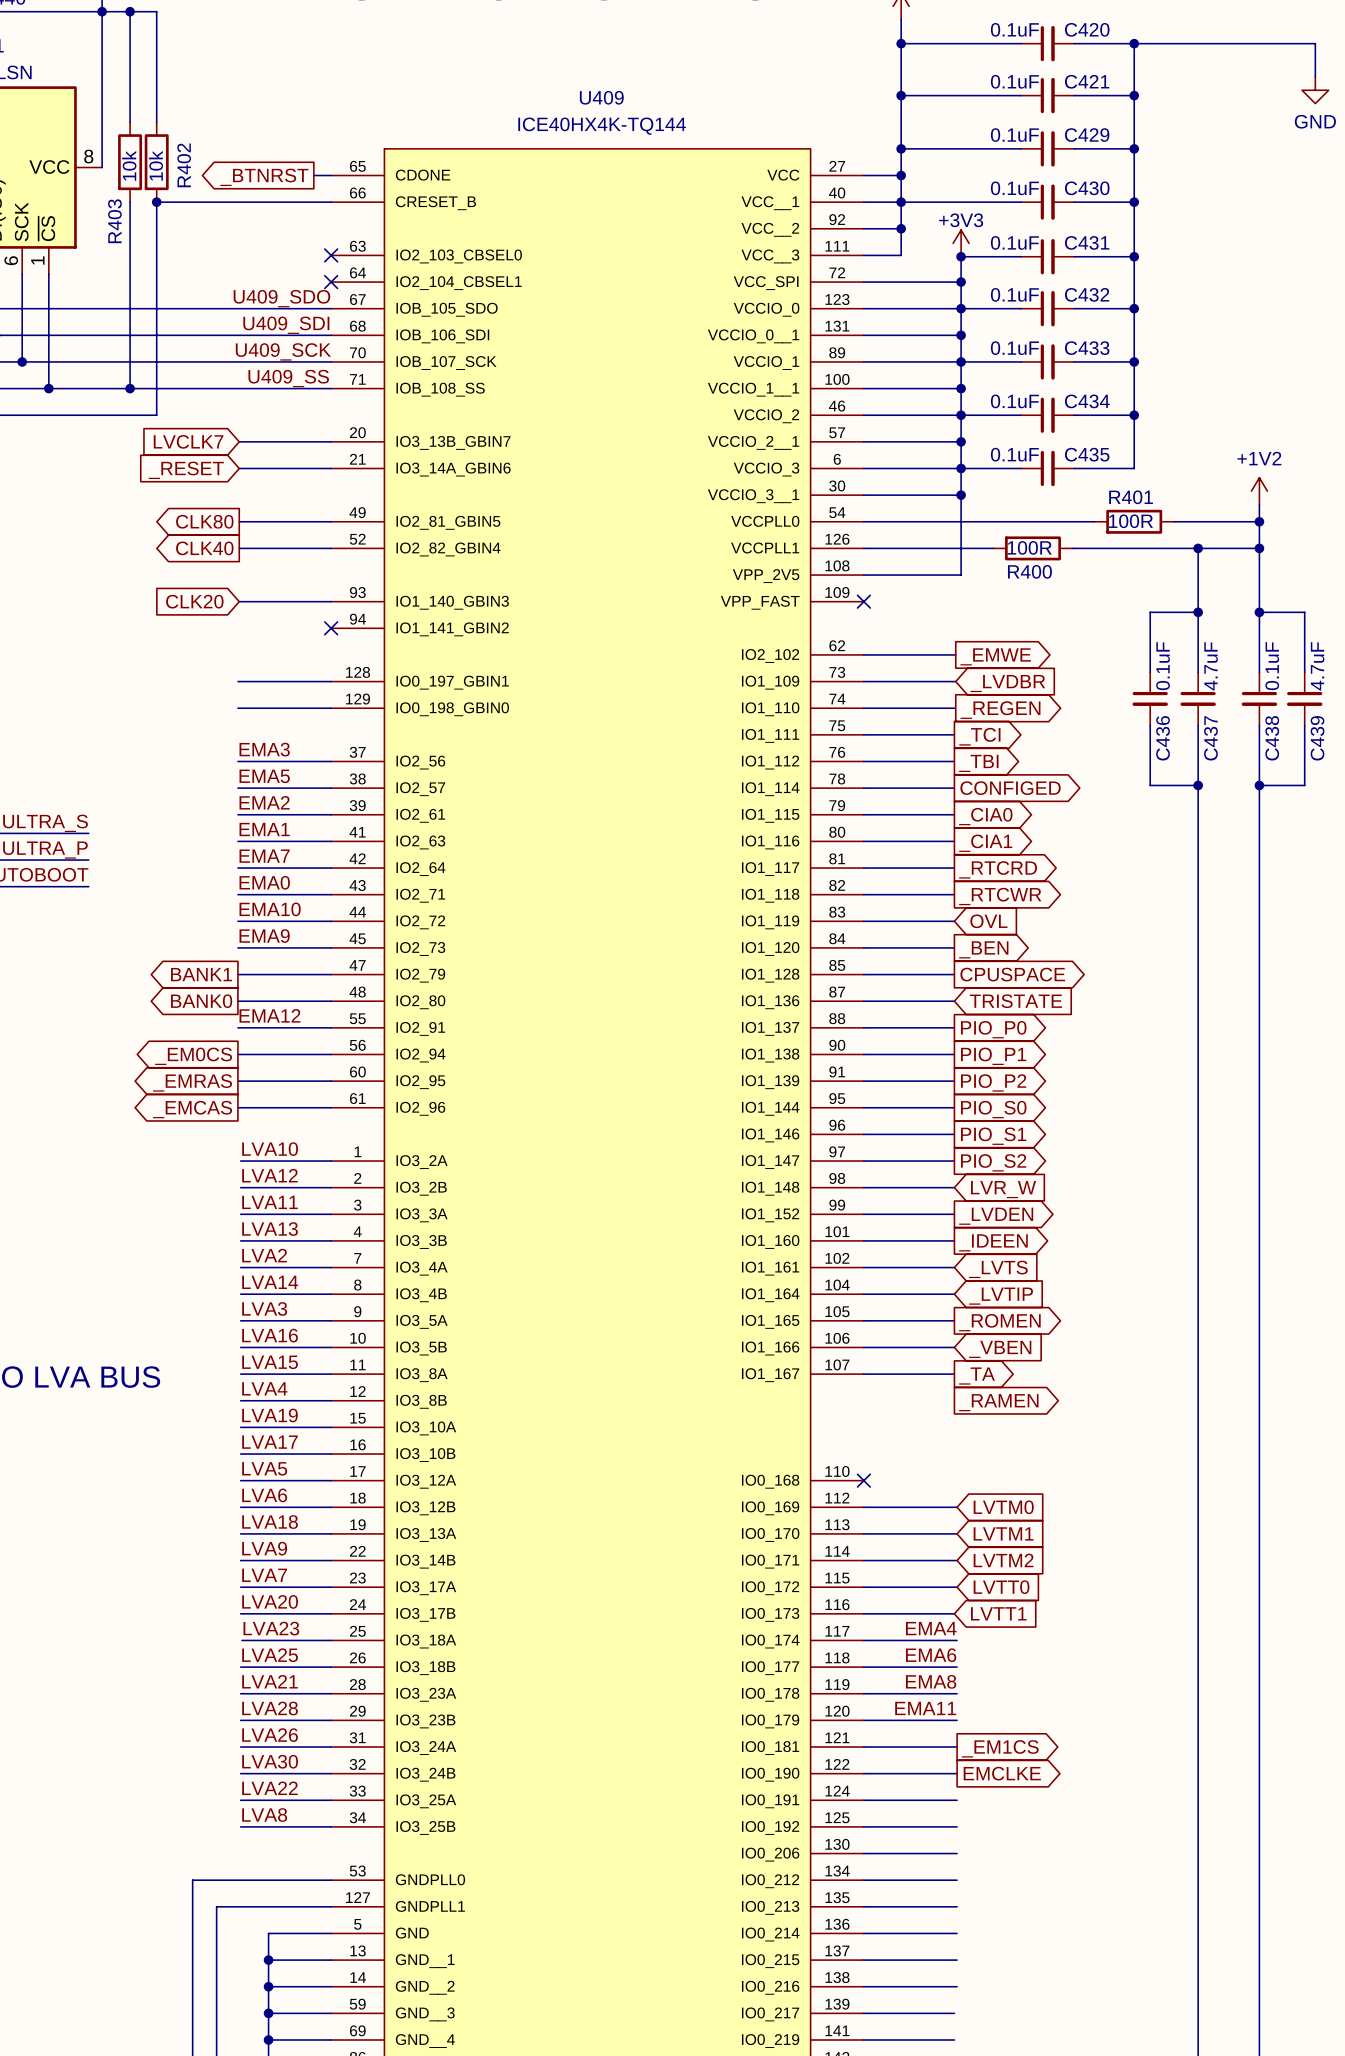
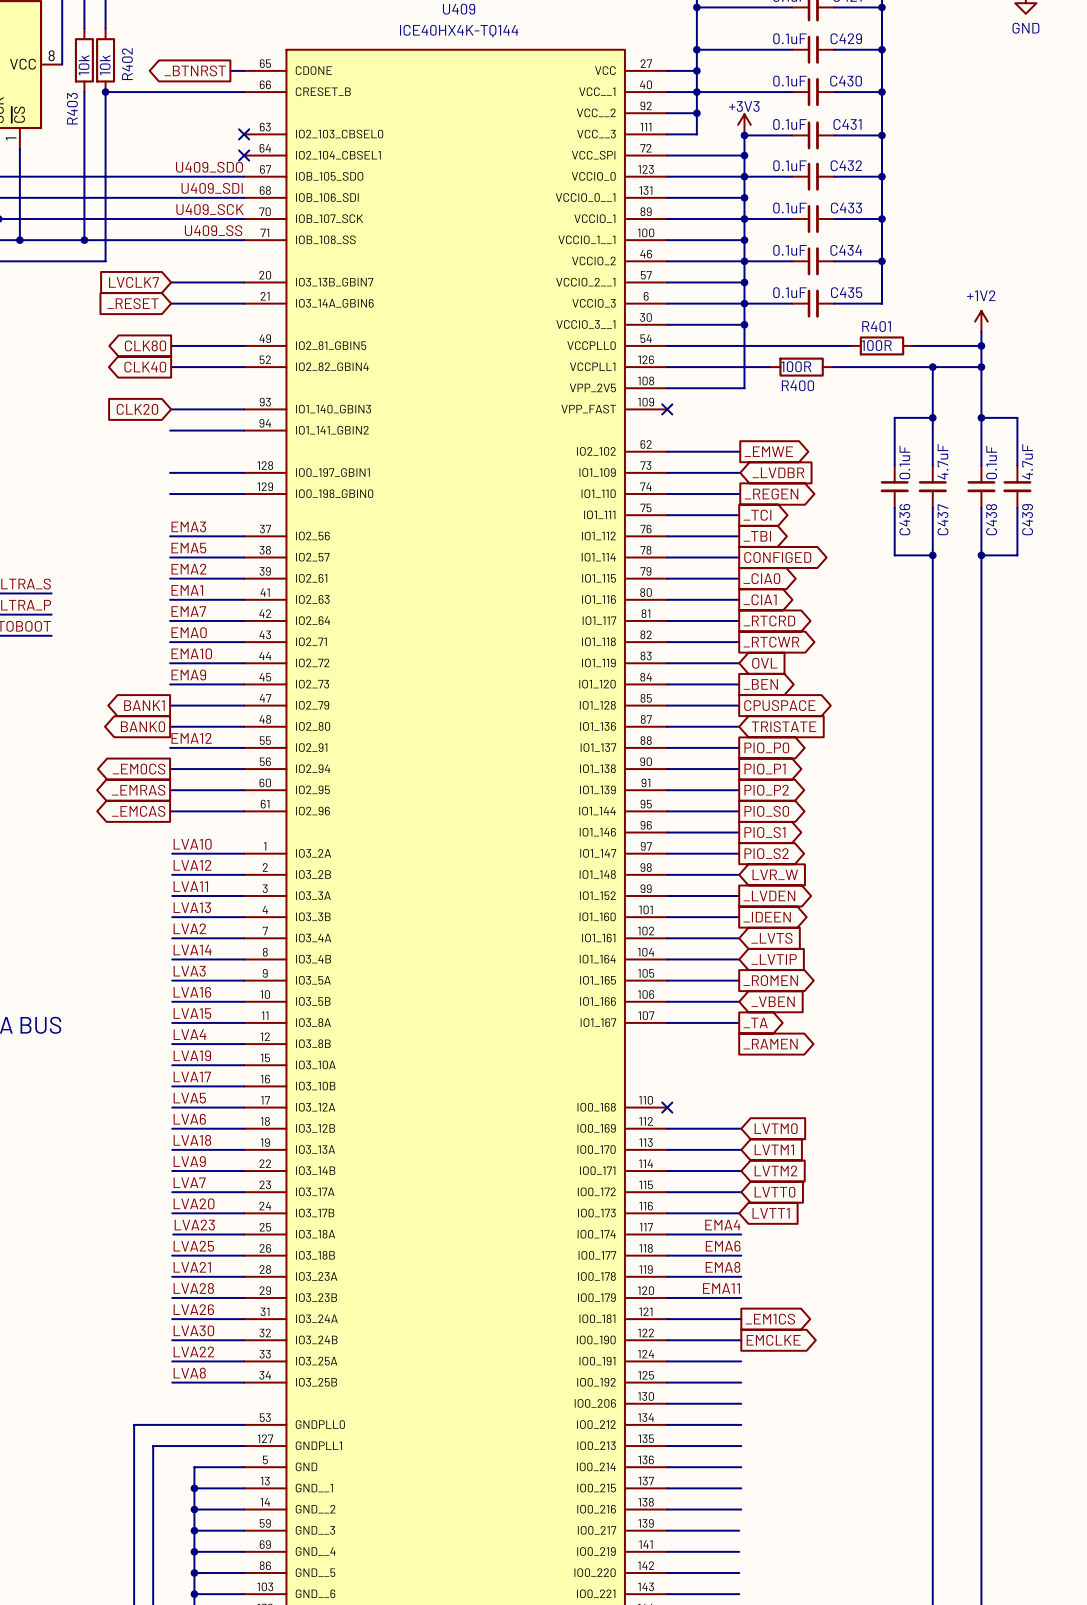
wire: none -> (170, 430) (244, 430)
no-connect mark: (331, 628) -> none

